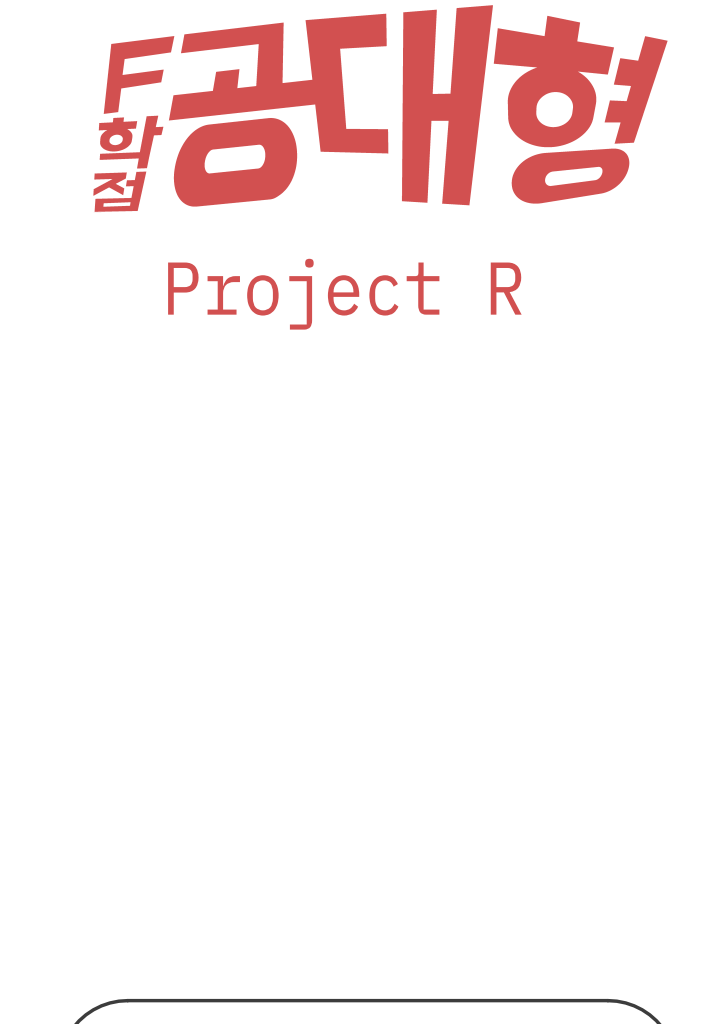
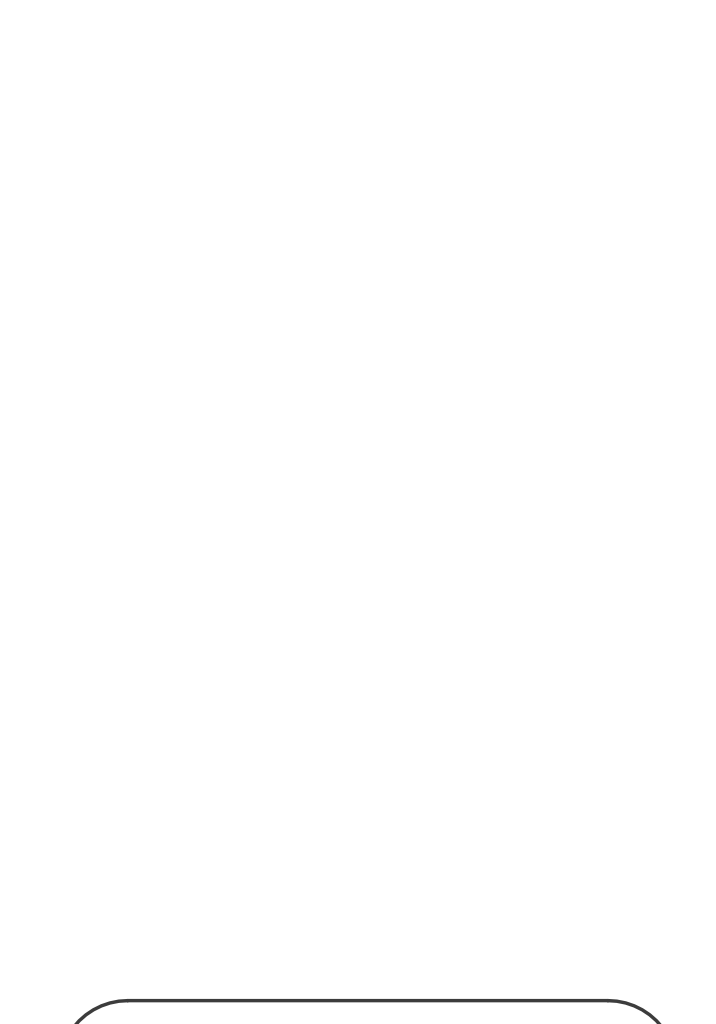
drawing: [93, 5, 668, 212] -> none
text: Project R (344, 294) -> none

